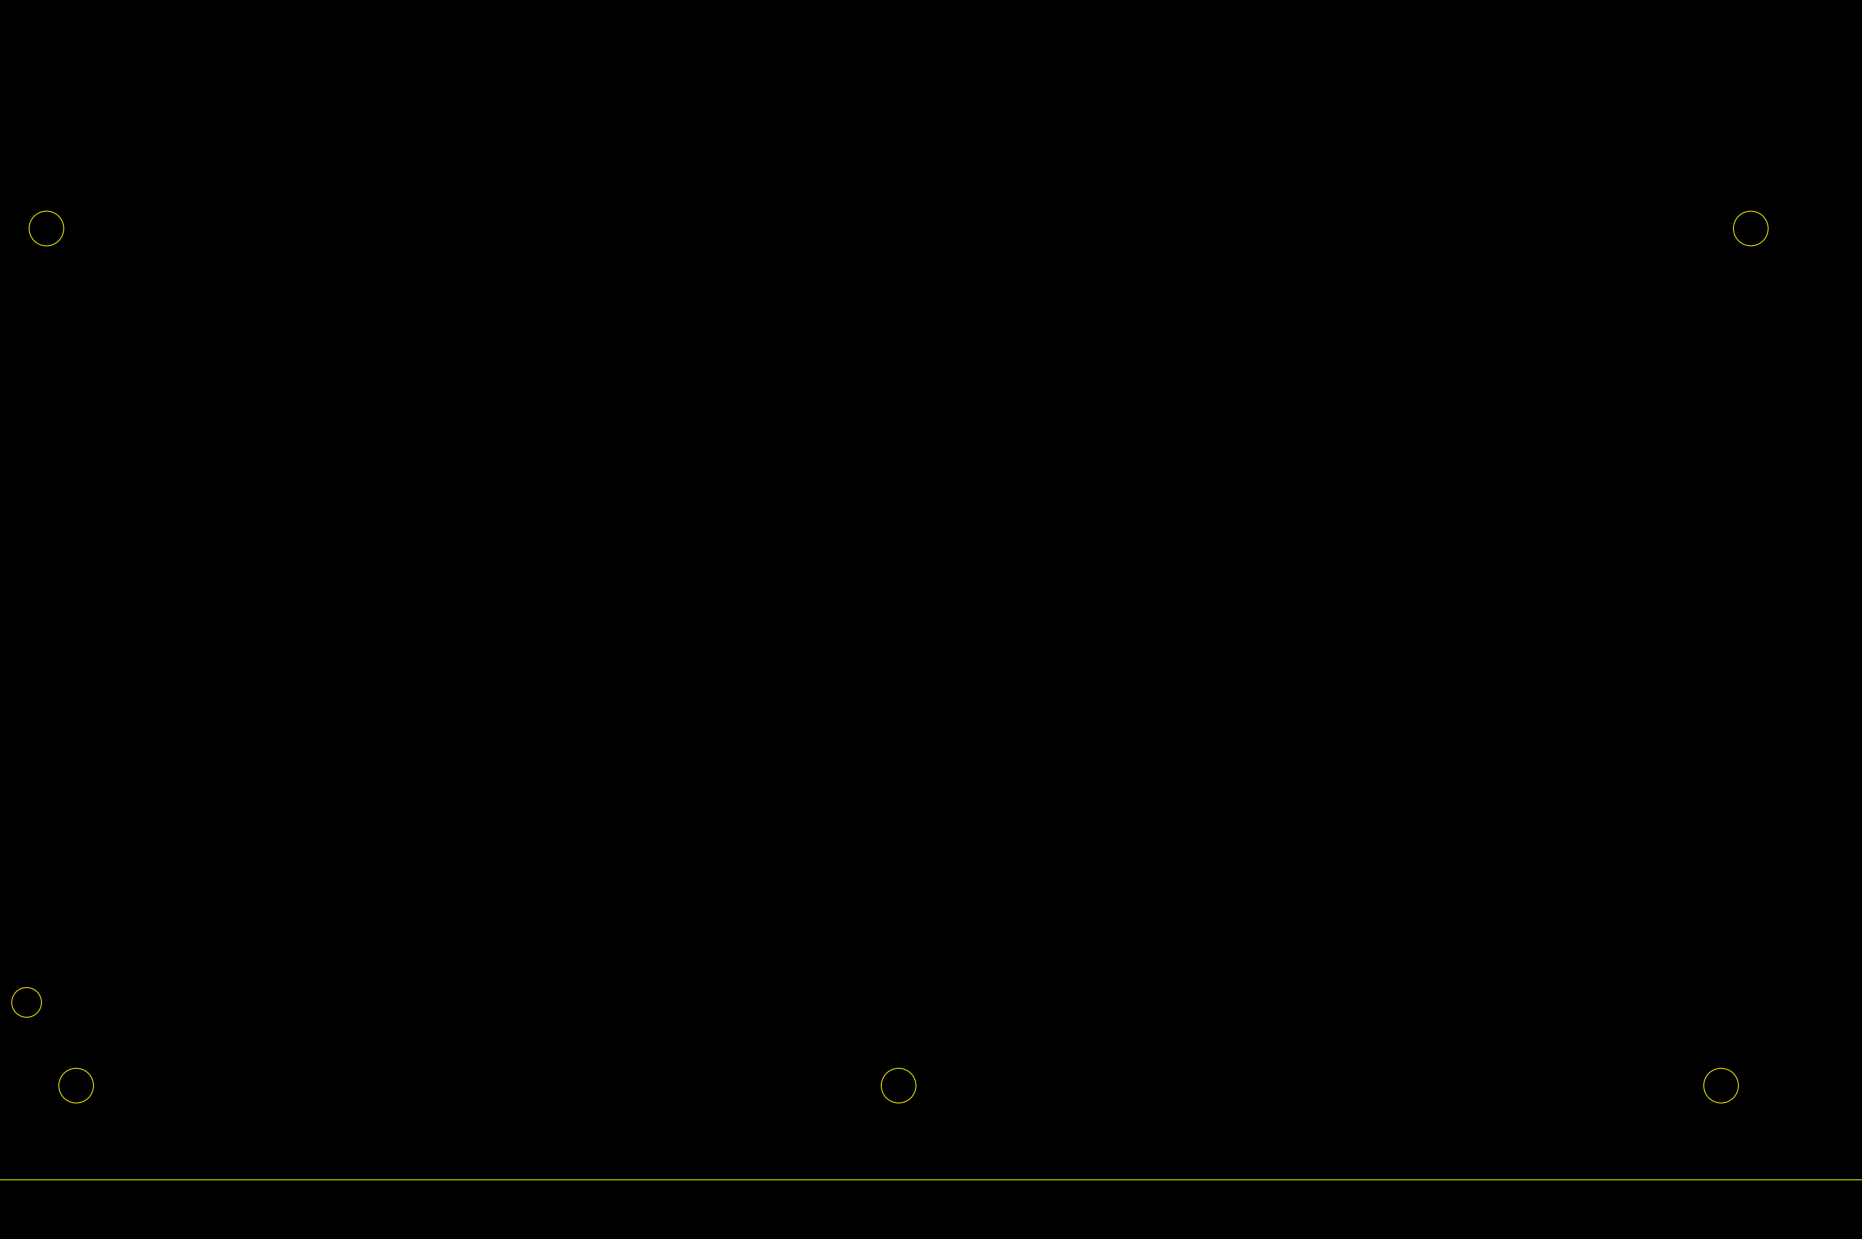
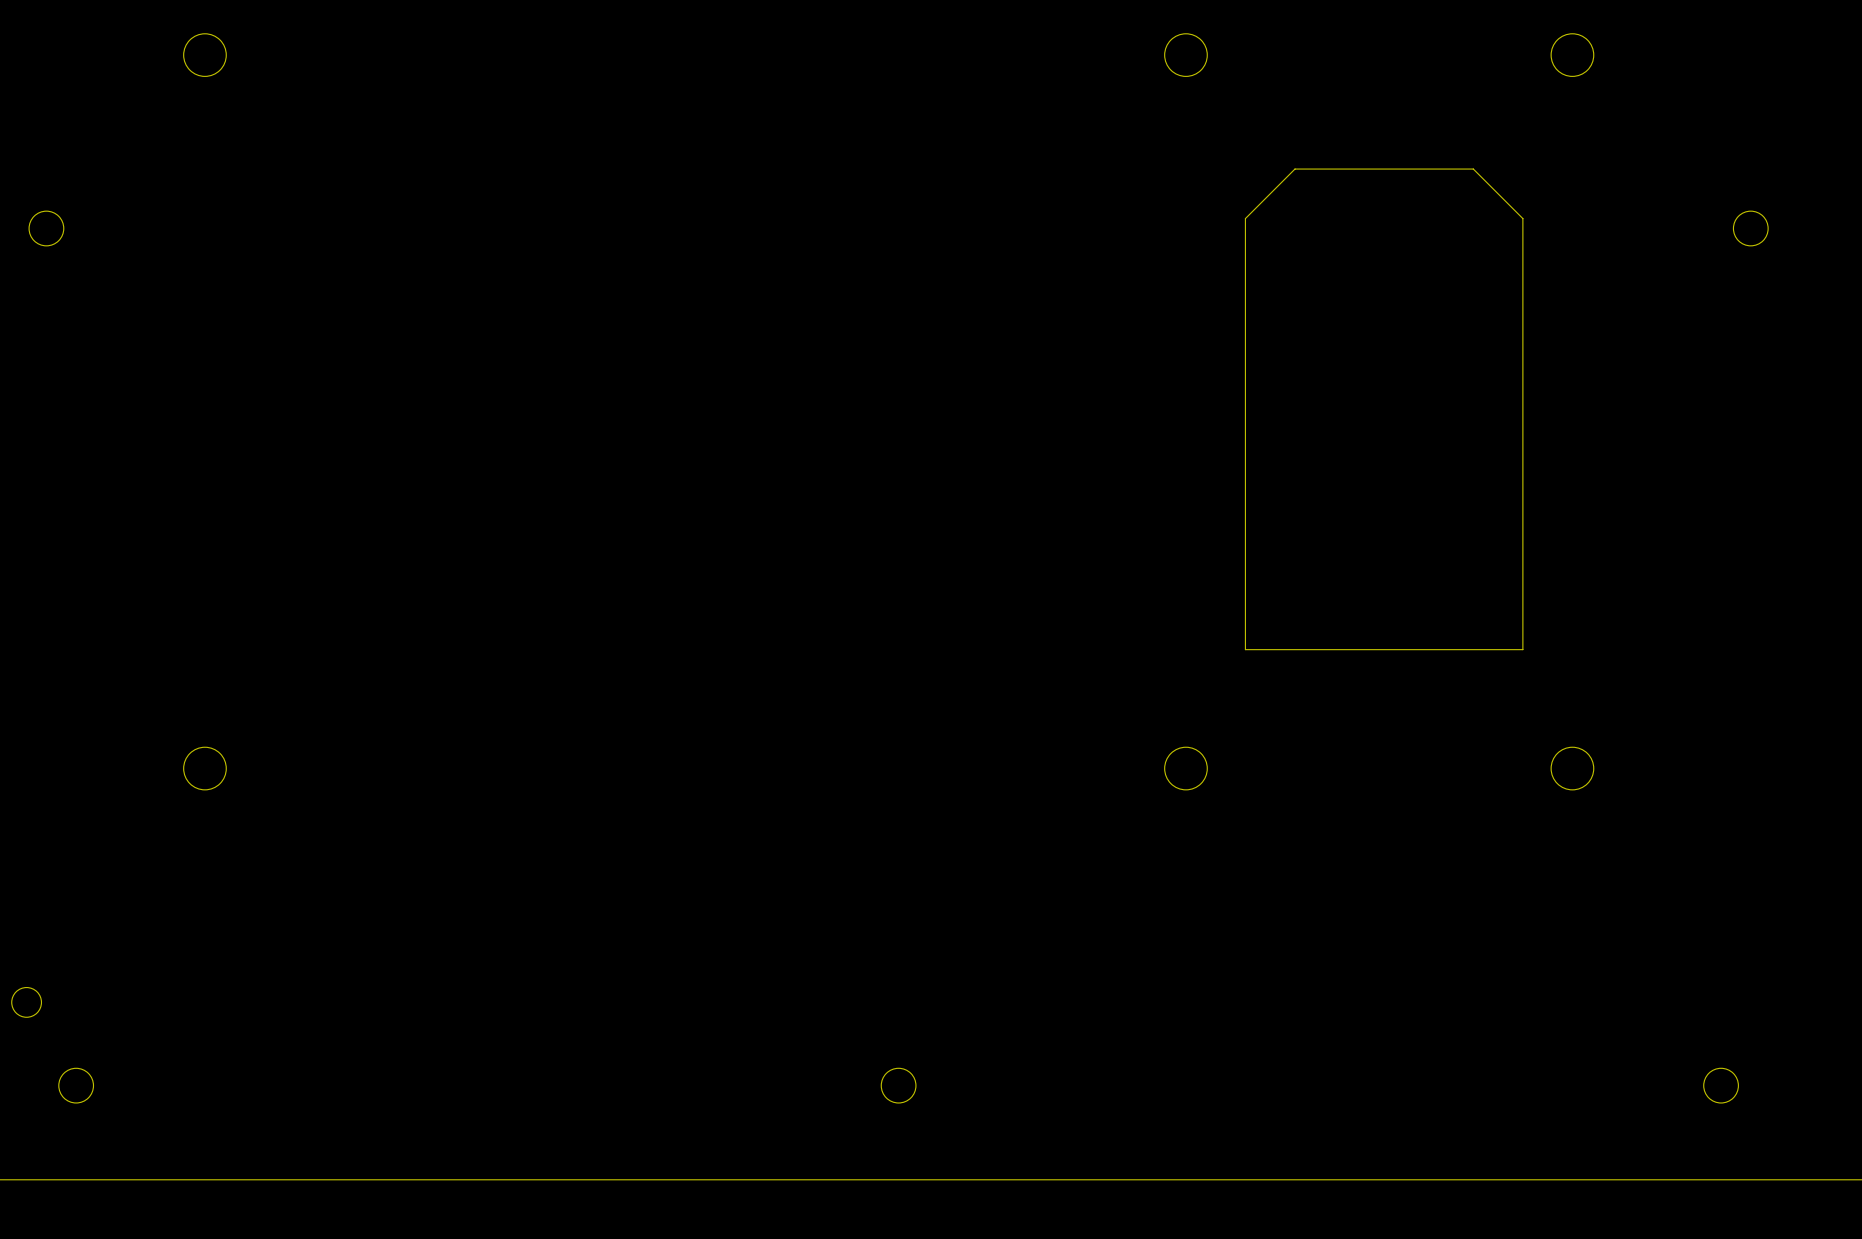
drawing: none -> [183, 33, 1594, 790]

